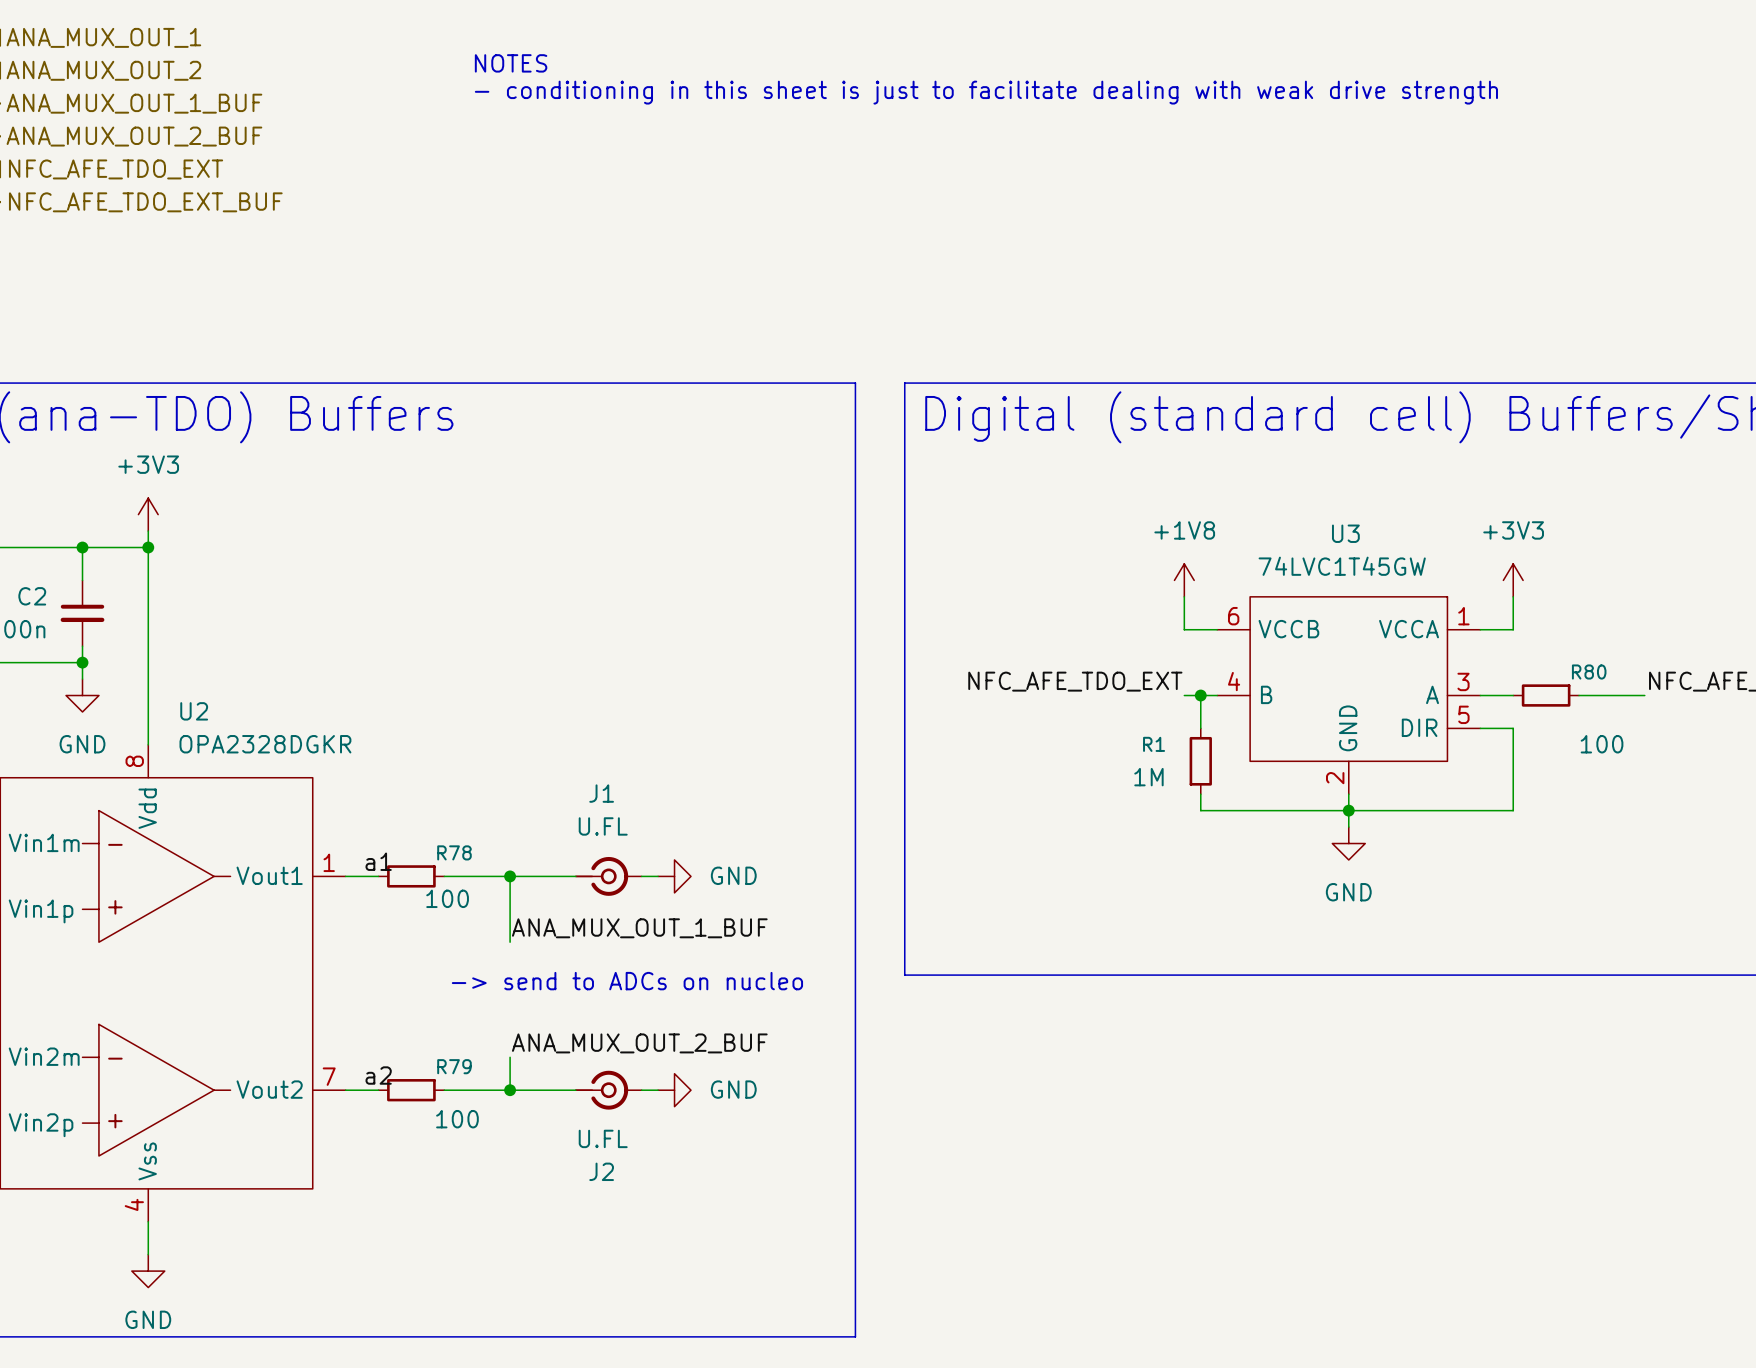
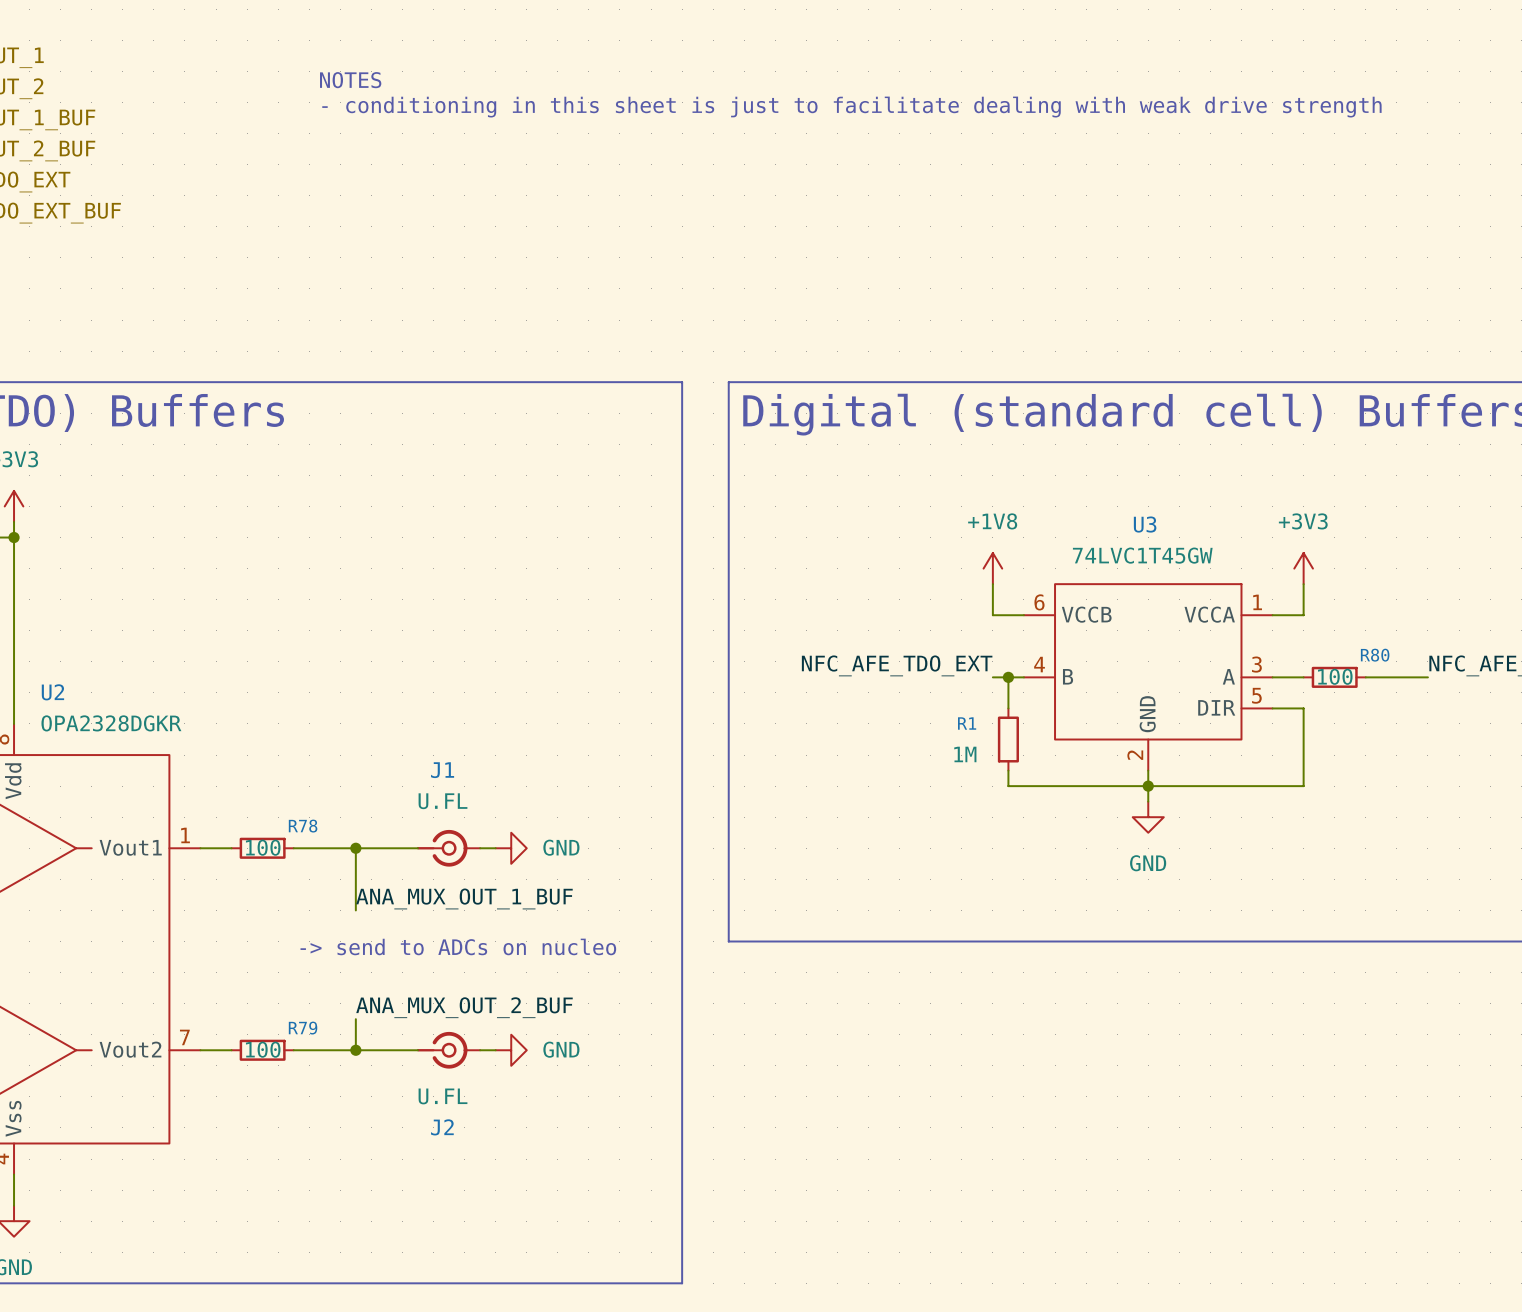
R80 value position: 100 (1602, 744) -> 100 (1335, 676)
label: a1 (378, 861) -> none
R78 value position: 100 (447, 898) -> 100 (263, 847)
label: a2 (378, 1075) -> none
R79 value position: 100 (457, 1119) -> 100 (263, 1049)

